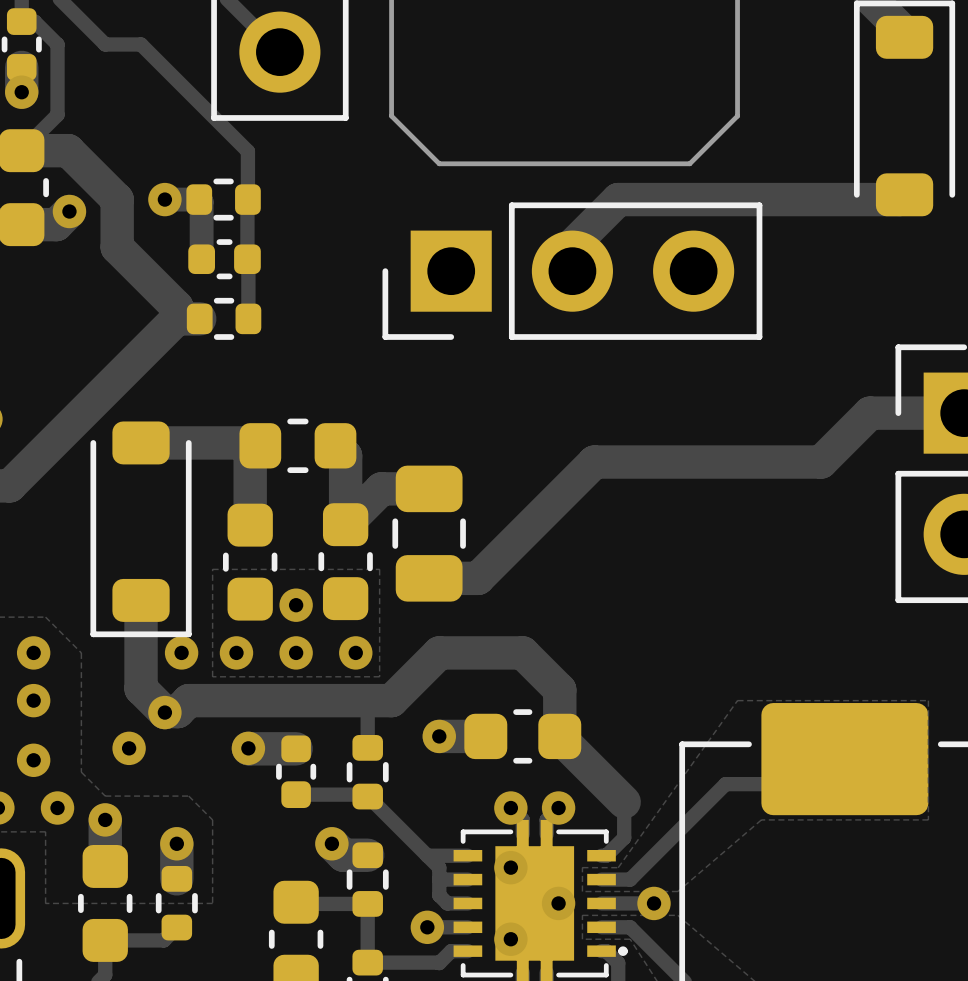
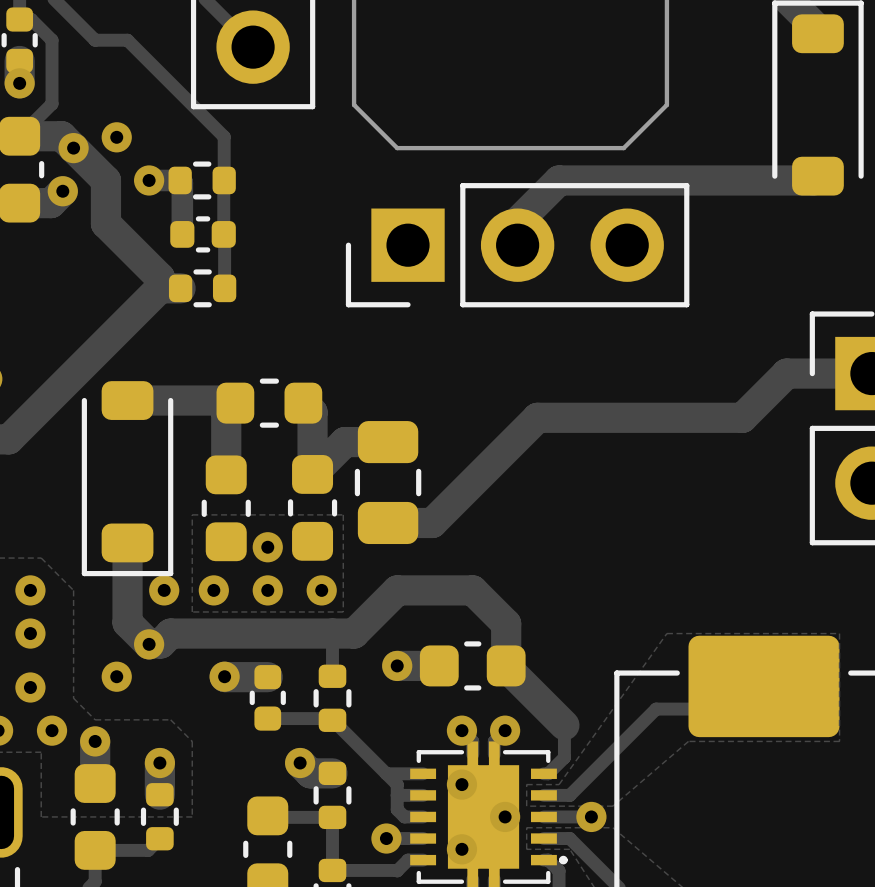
via: none -> (116, 137)
via: none -> (73, 148)

